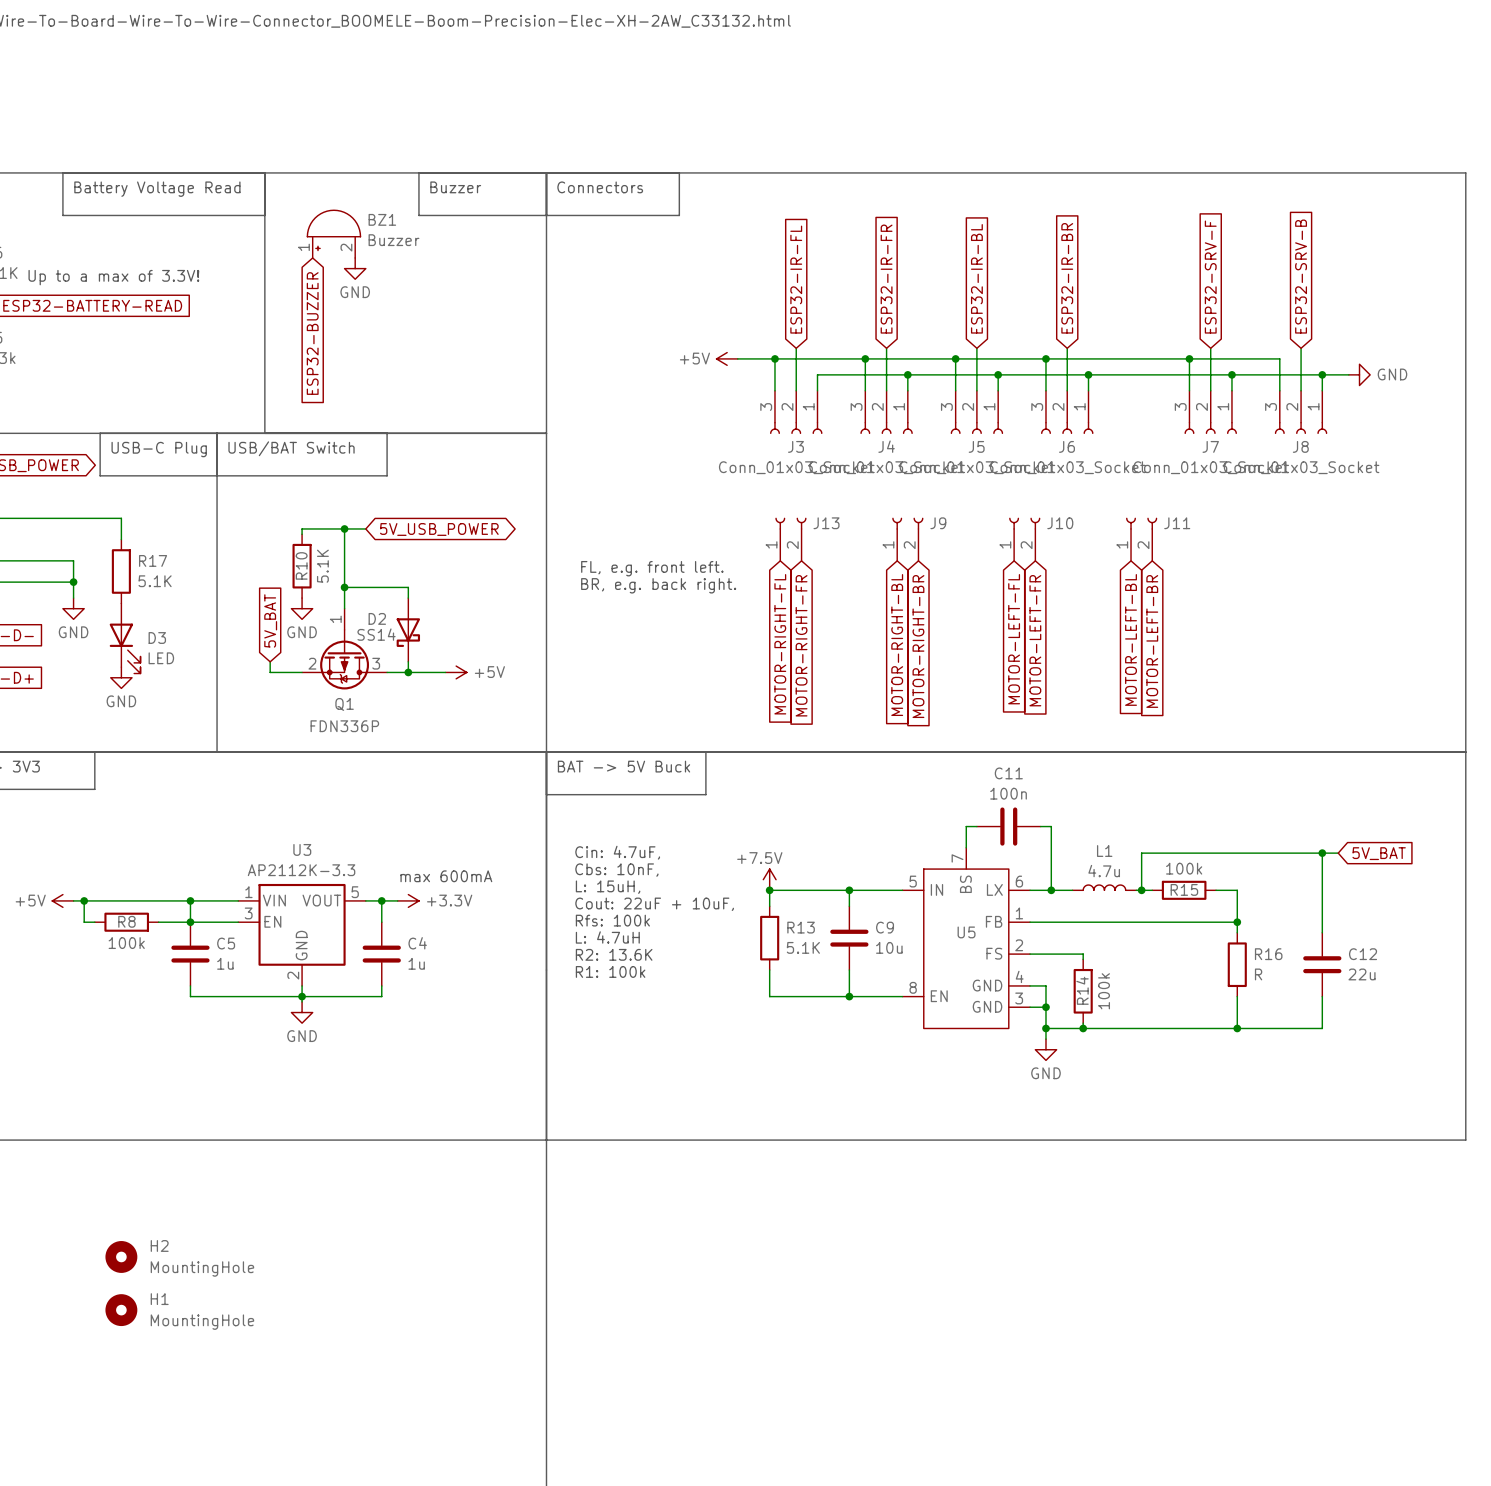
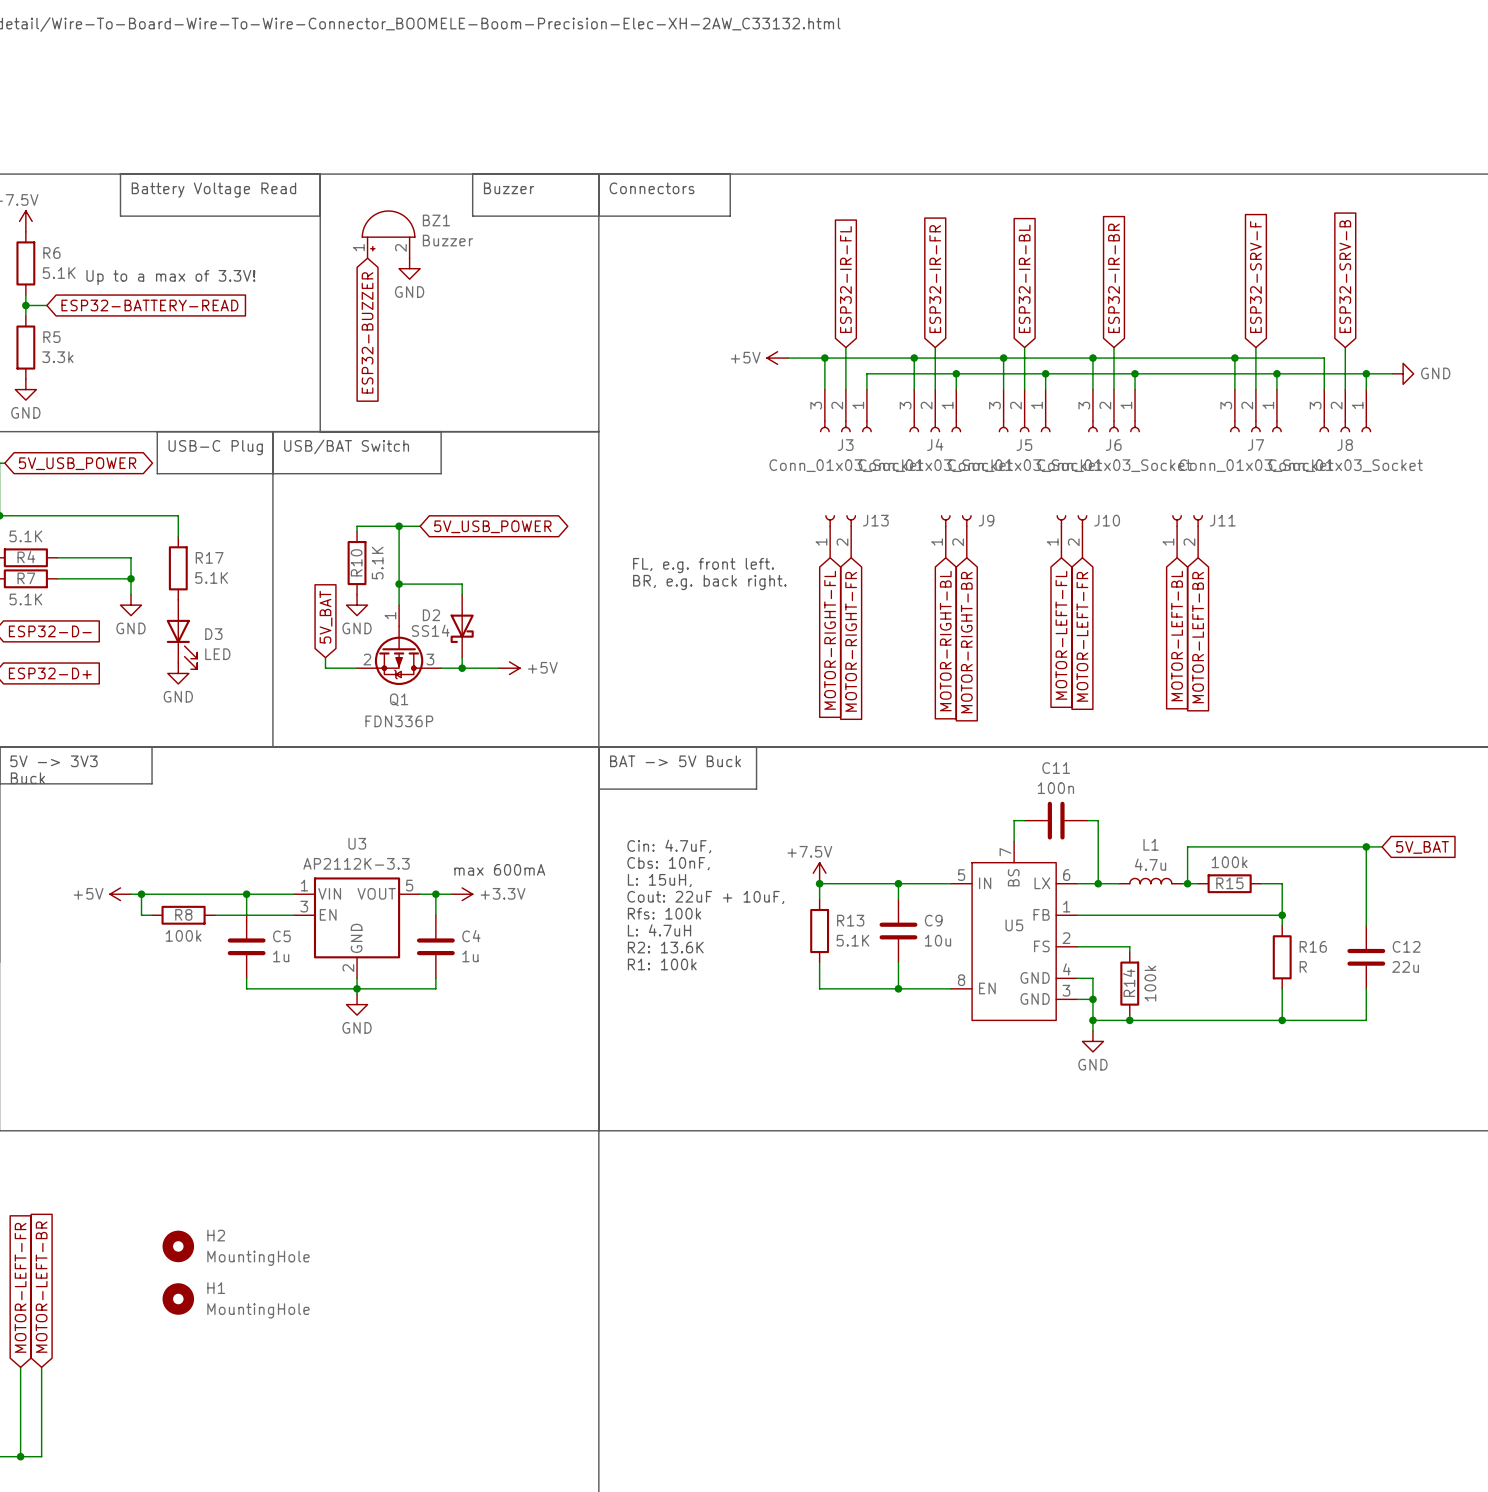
junction: (190, 922) -> none

